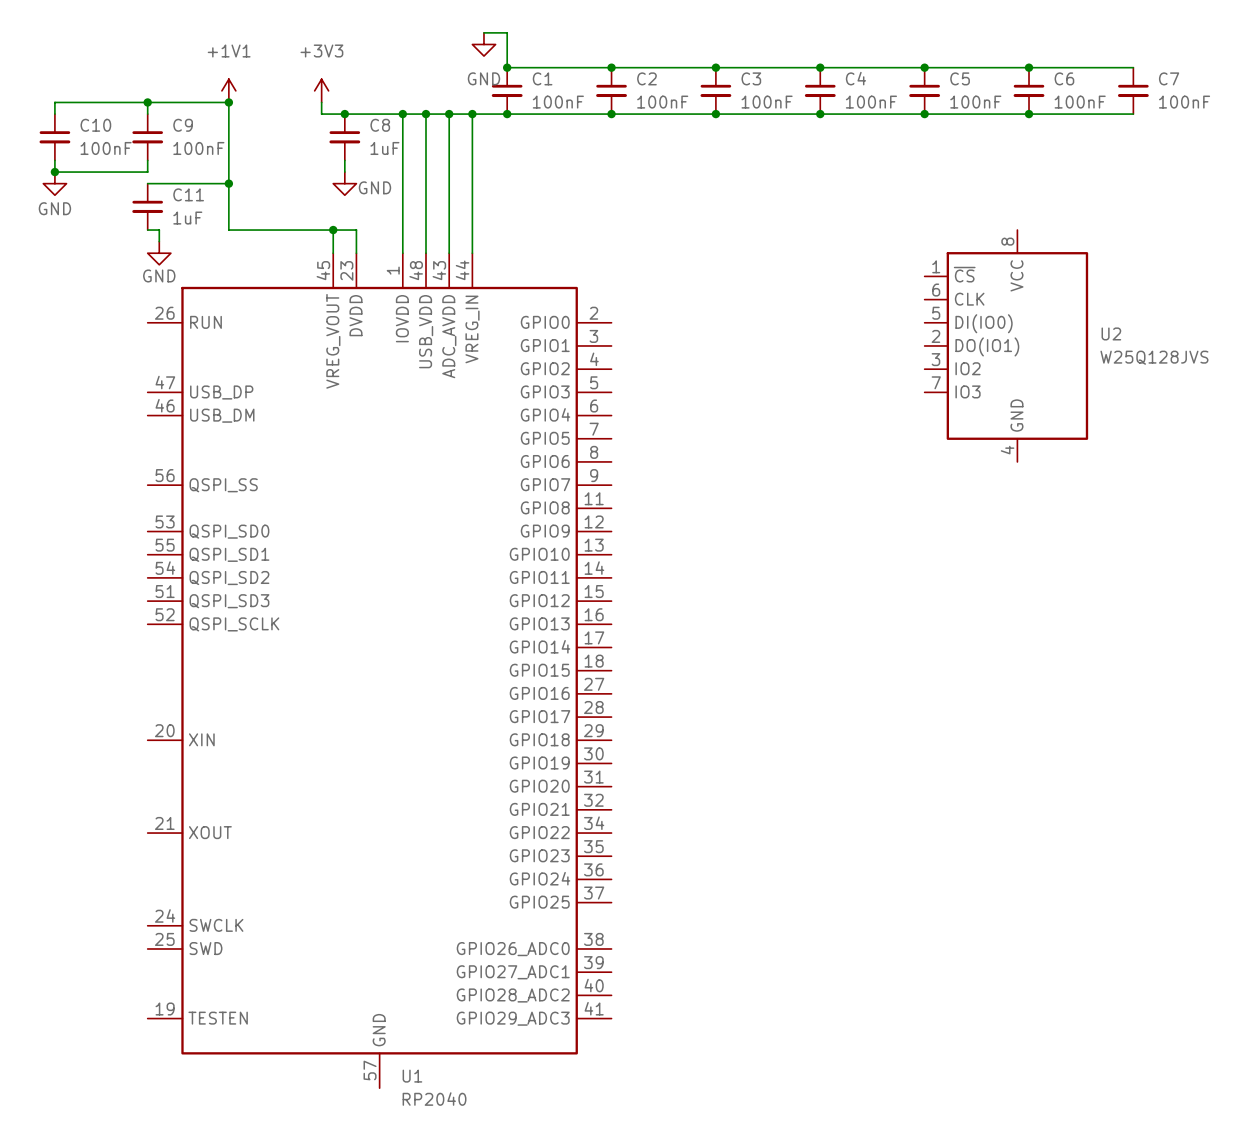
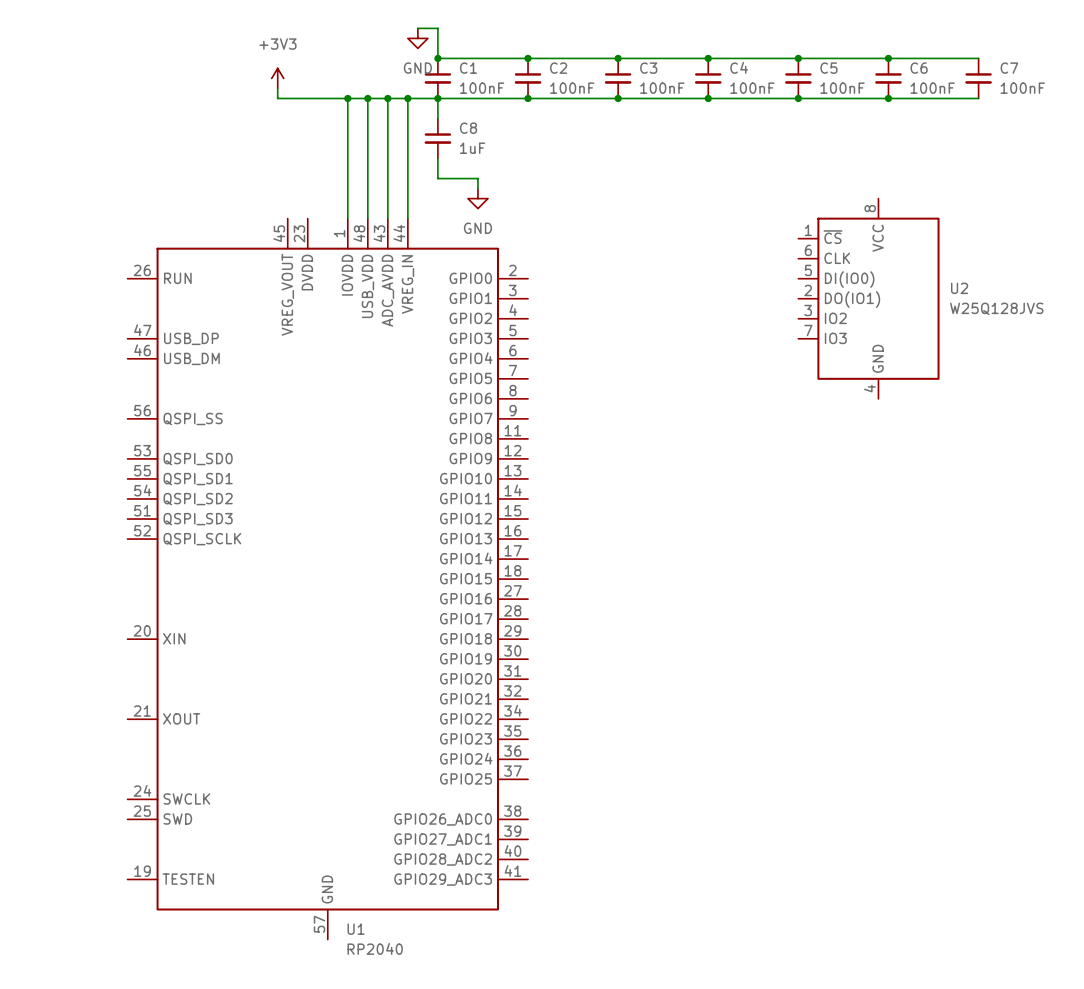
power symbol: +1V1 (228, 90) -> none
wire: (147, 102) (147, 114) -> none
junction: (147, 102) -> none
junction: (228, 102) -> none
wire: (54, 114) (54, 102) (228, 102) (228, 230) (356, 230) (356, 253) -> none
junction: (344, 114) -> none
C10: 100nF (54, 137) -> none
C9: 100nF (147, 137) -> none
C8 position: (344, 137) -> (437, 138)
wire: (54, 160) (54, 172) (147, 172) (147, 160) -> none
wire: (344, 160) (344, 172) -> none
junction: (54, 172) -> none
power symbol: GND (54, 183) -> none
wire: (147, 183) (228, 183) -> none
junction: (228, 183) -> none
power symbol: GND (344, 183) -> none
wire: none -> (437, 158) (437, 178) (477, 178) (477, 188)
C11: 1uF (147, 206) -> none
wire: (147, 230) (159, 230) (159, 241) -> none
wire: (333, 230) (333, 253) -> (437, 98) (437, 118)
junction: (333, 230) -> none
power symbol: none -> GND (477, 198)
power symbol: GND (159, 253) -> none

